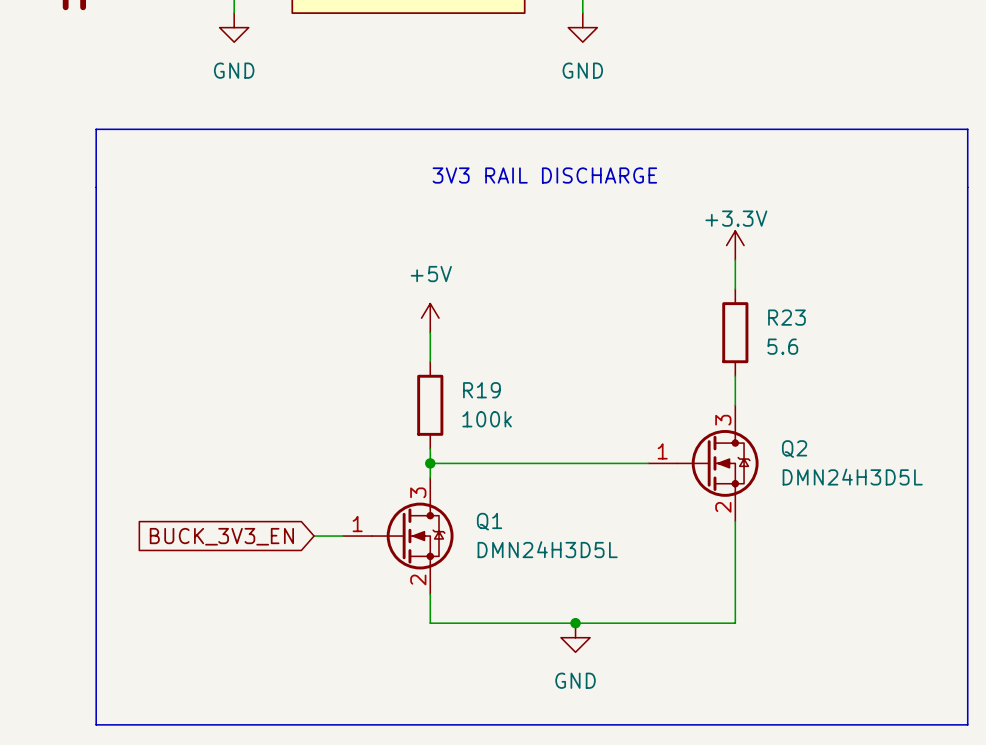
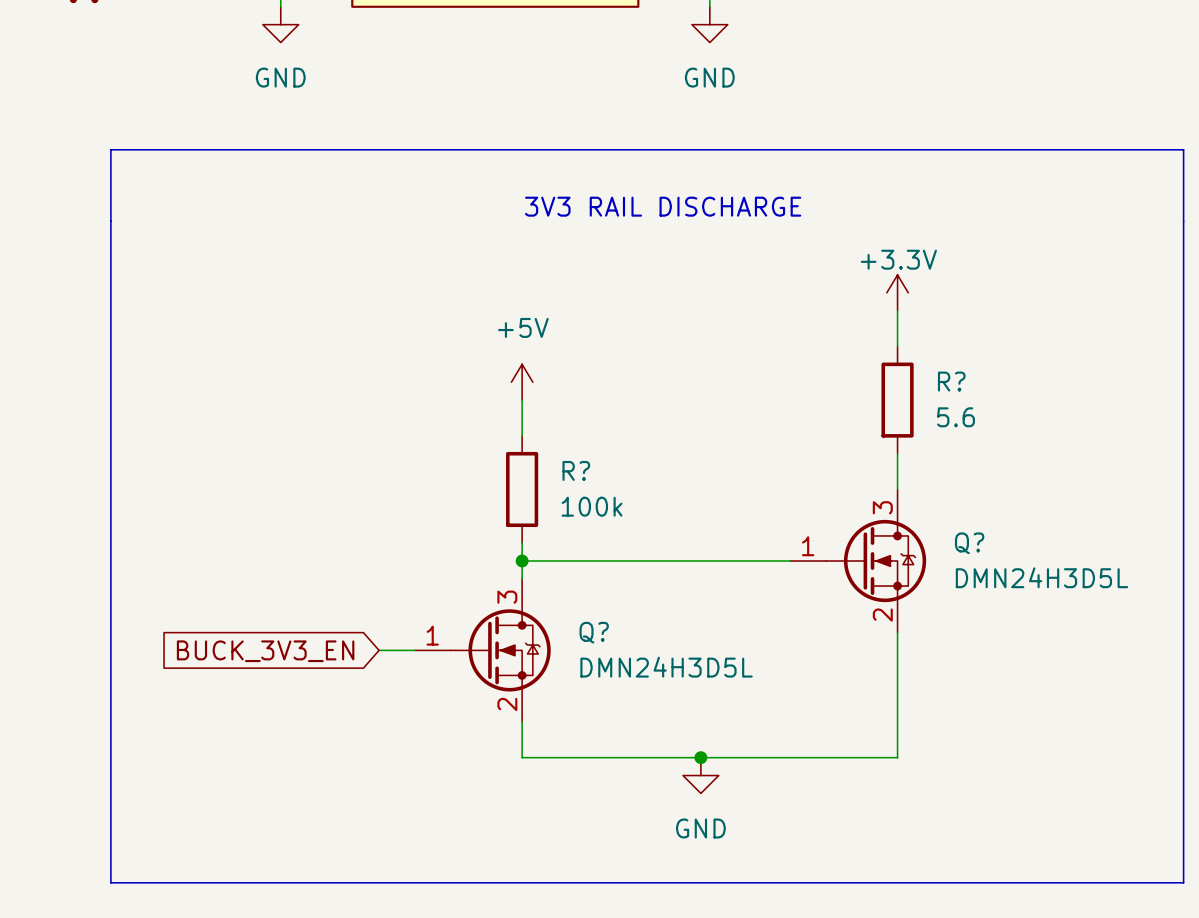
R23 name: R23 (786, 317) -> R? (951, 381)
R19 name: R19 (481, 390) -> R? (576, 470)
Q2 name: Q2 (794, 449) -> Q? (969, 543)
Q1 name: Q1 (489, 521) -> Q? (594, 632)

